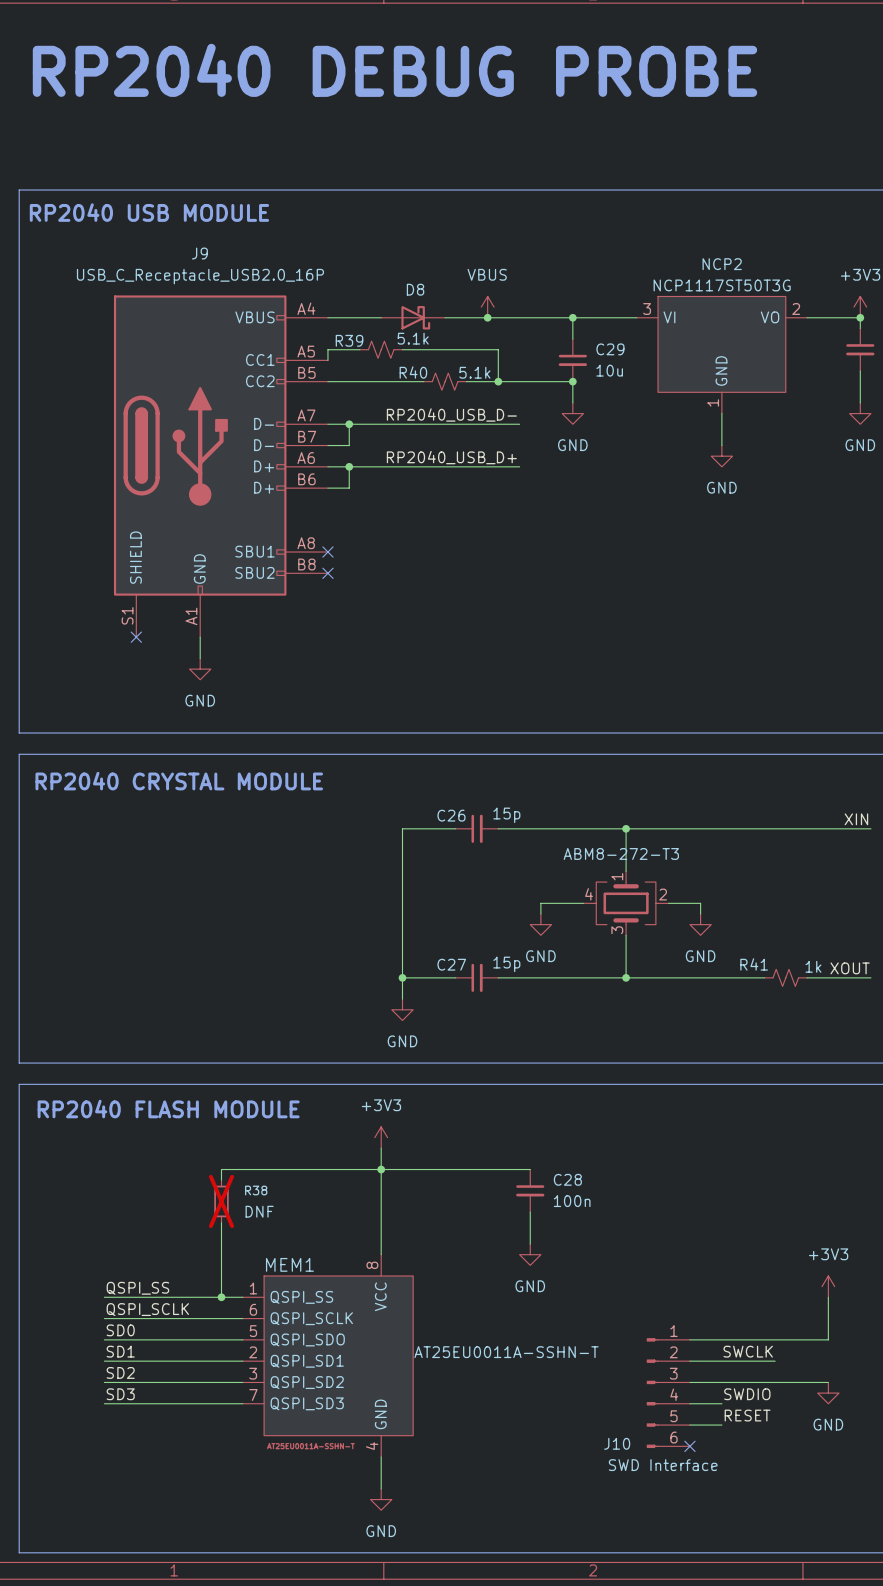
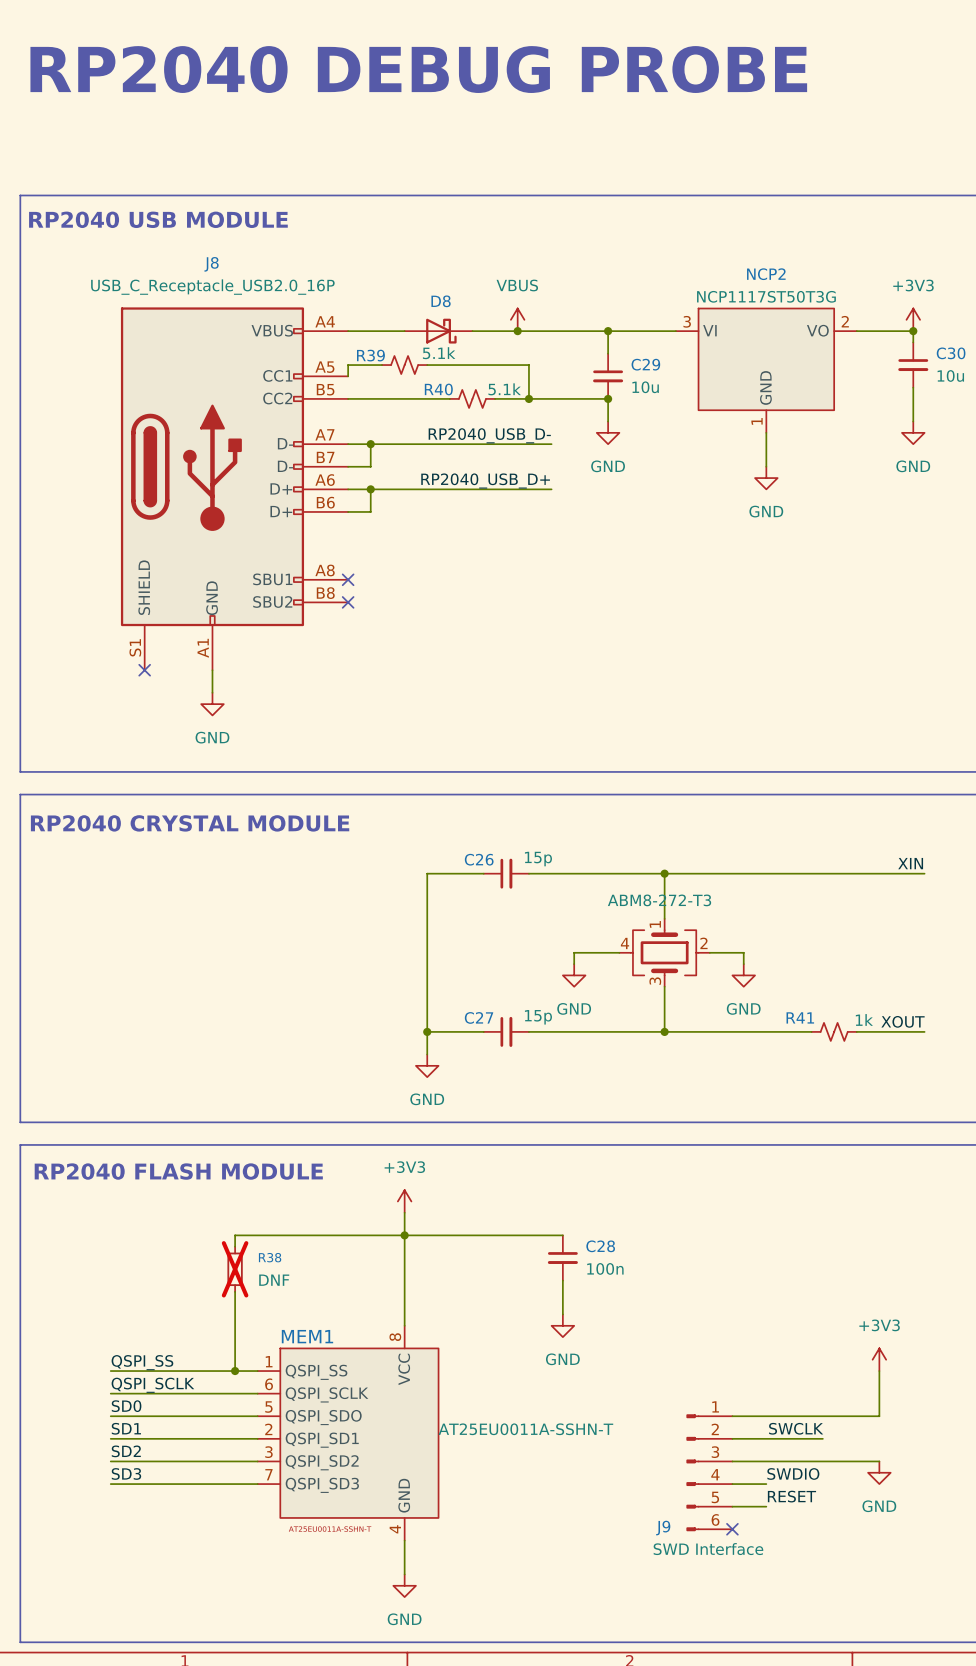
J9 name: J9 (199, 253) -> J8 (211, 264)
J10 name: J10 (617, 1443) -> J9 (663, 1528)

